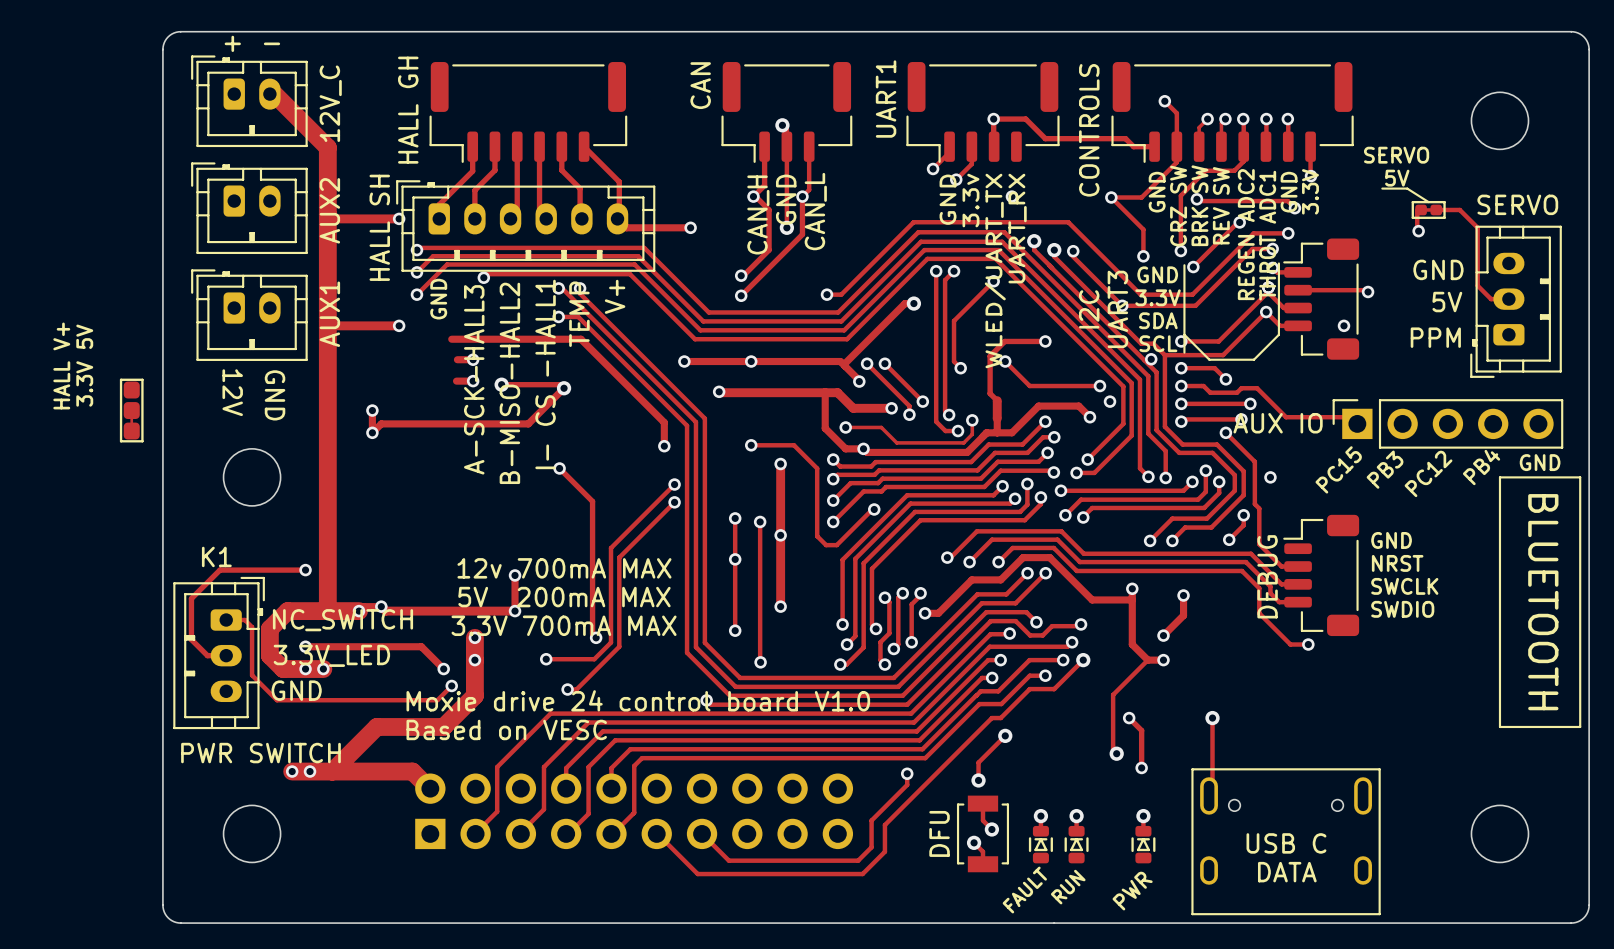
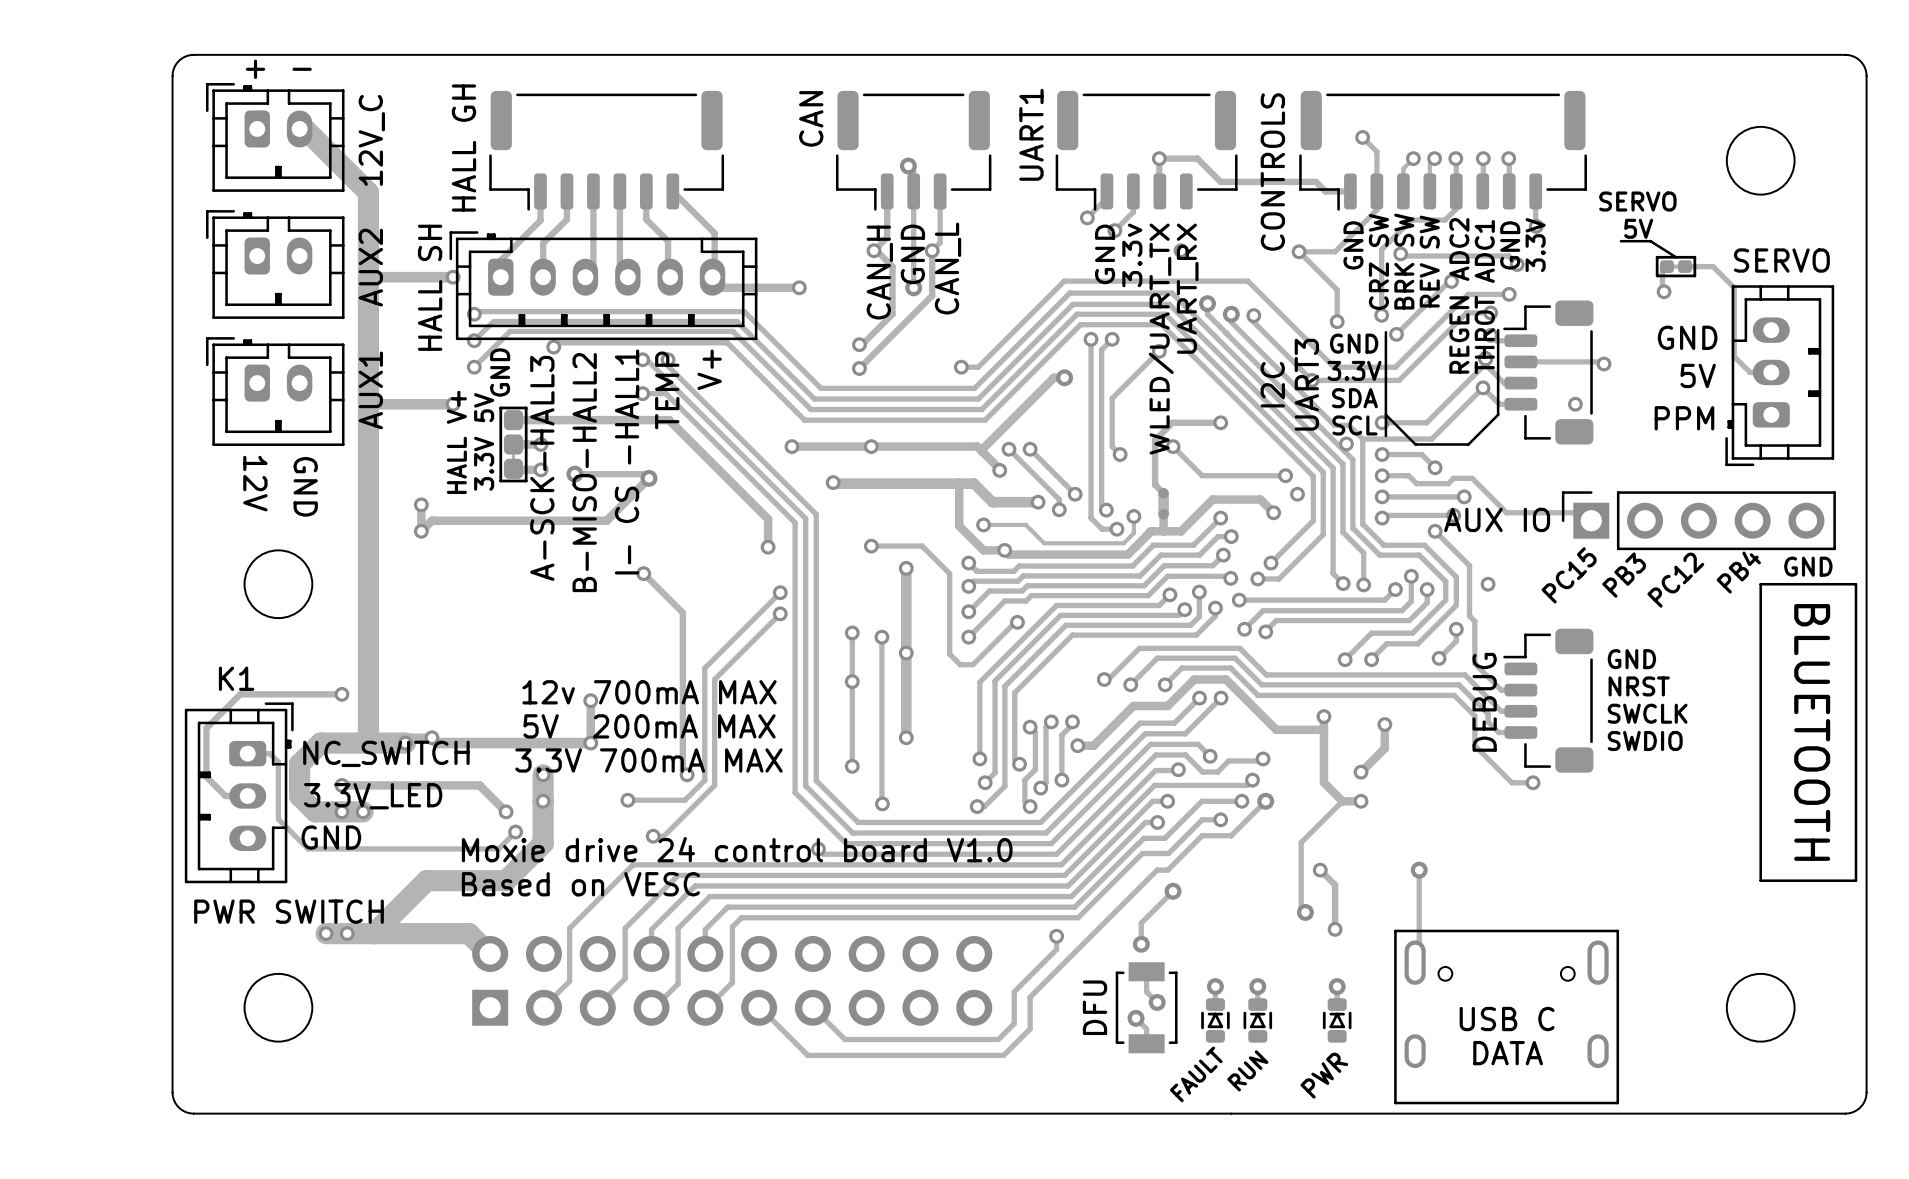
text position: HALL V+ (61, 365) -> HALL V+ (456, 442)
text position: 3.3V 5V (84, 365) -> 3.3V 5V (484, 441)
part position: (131, 410) -> (513, 444)

